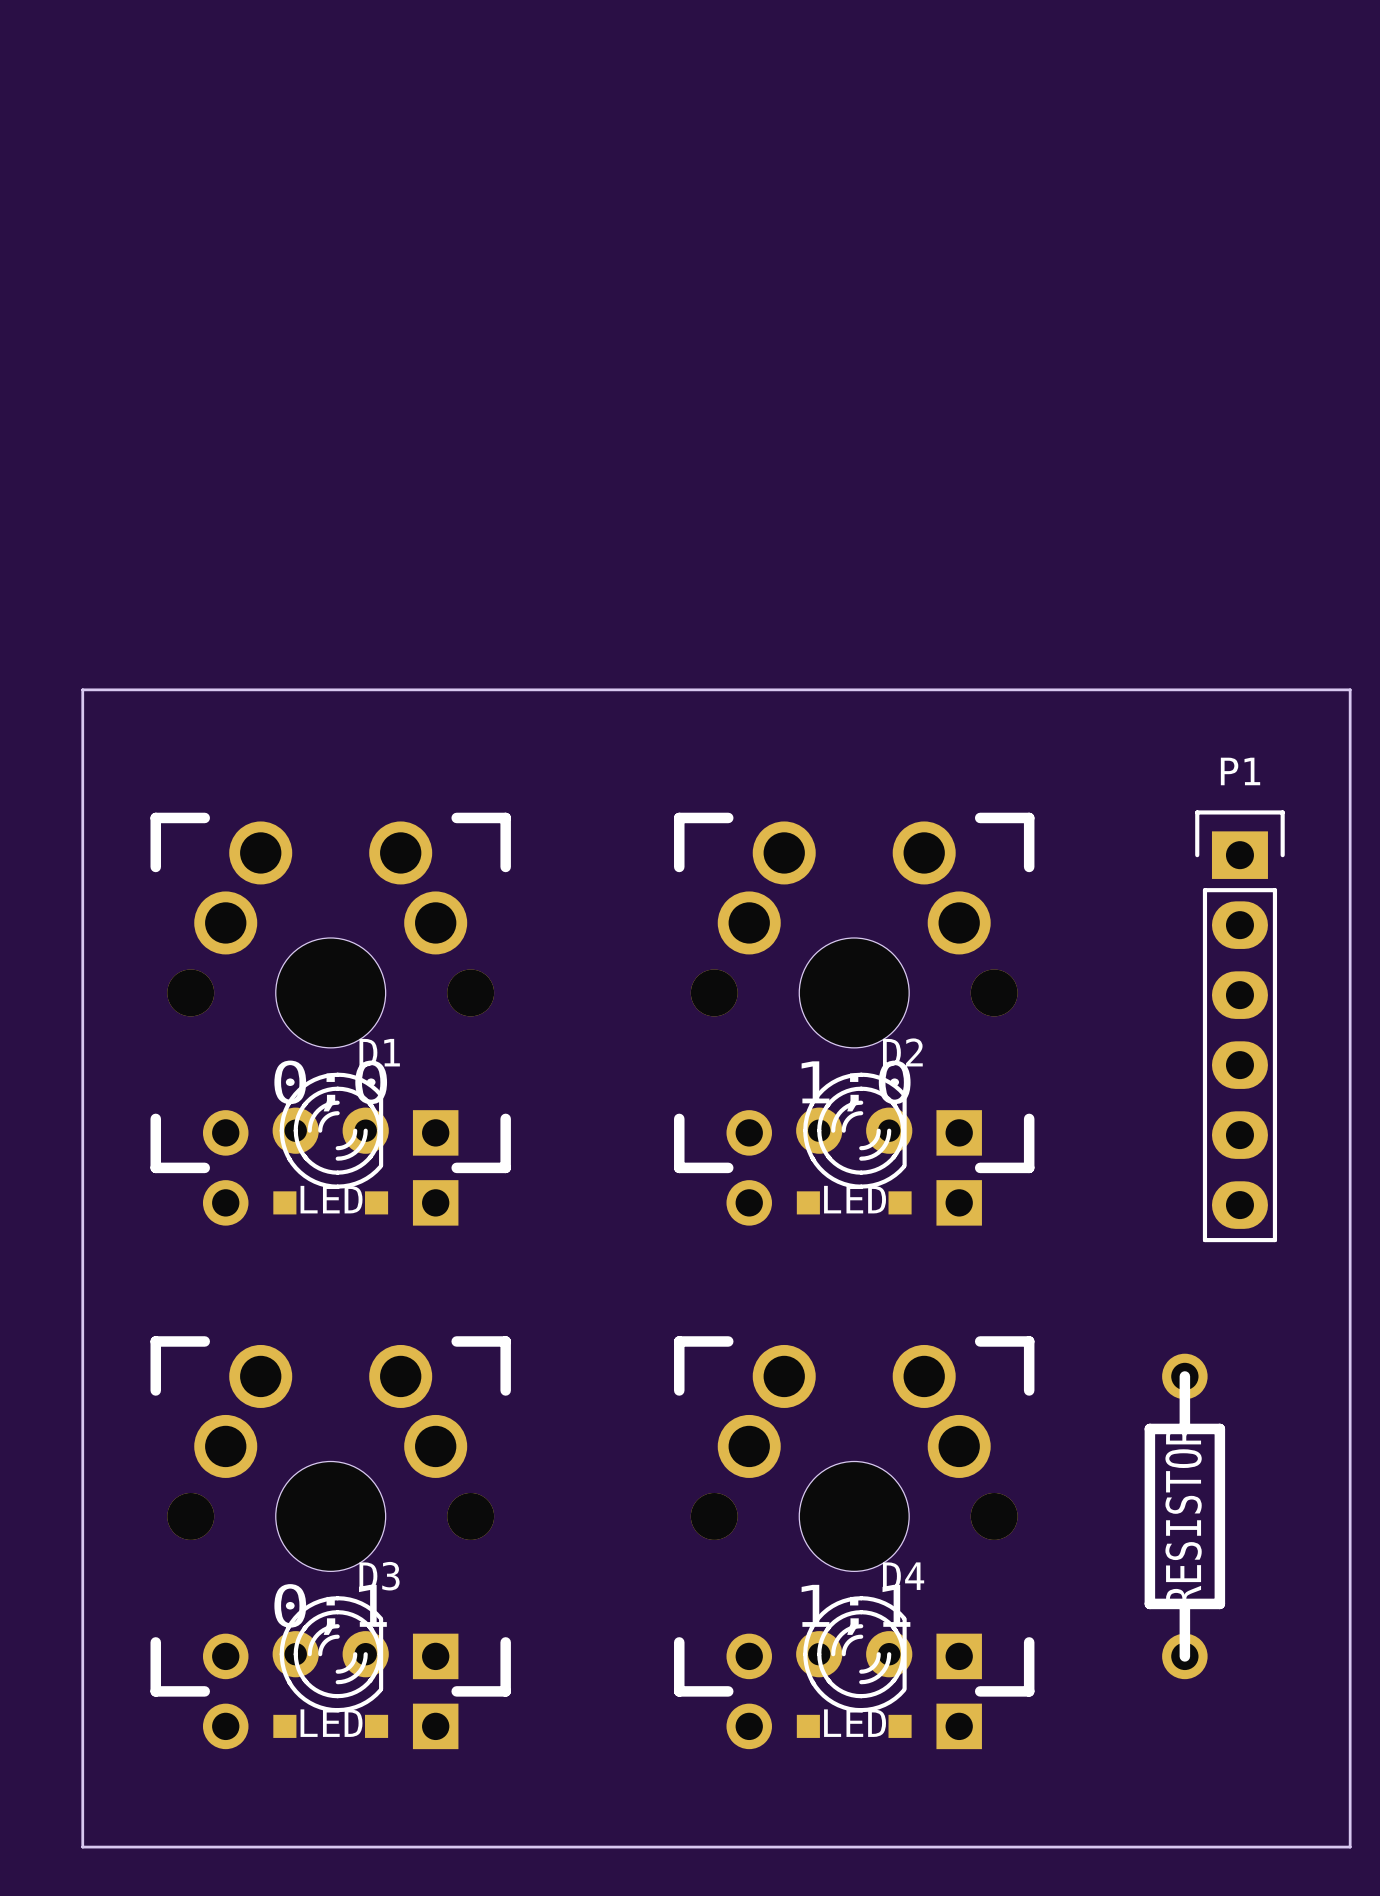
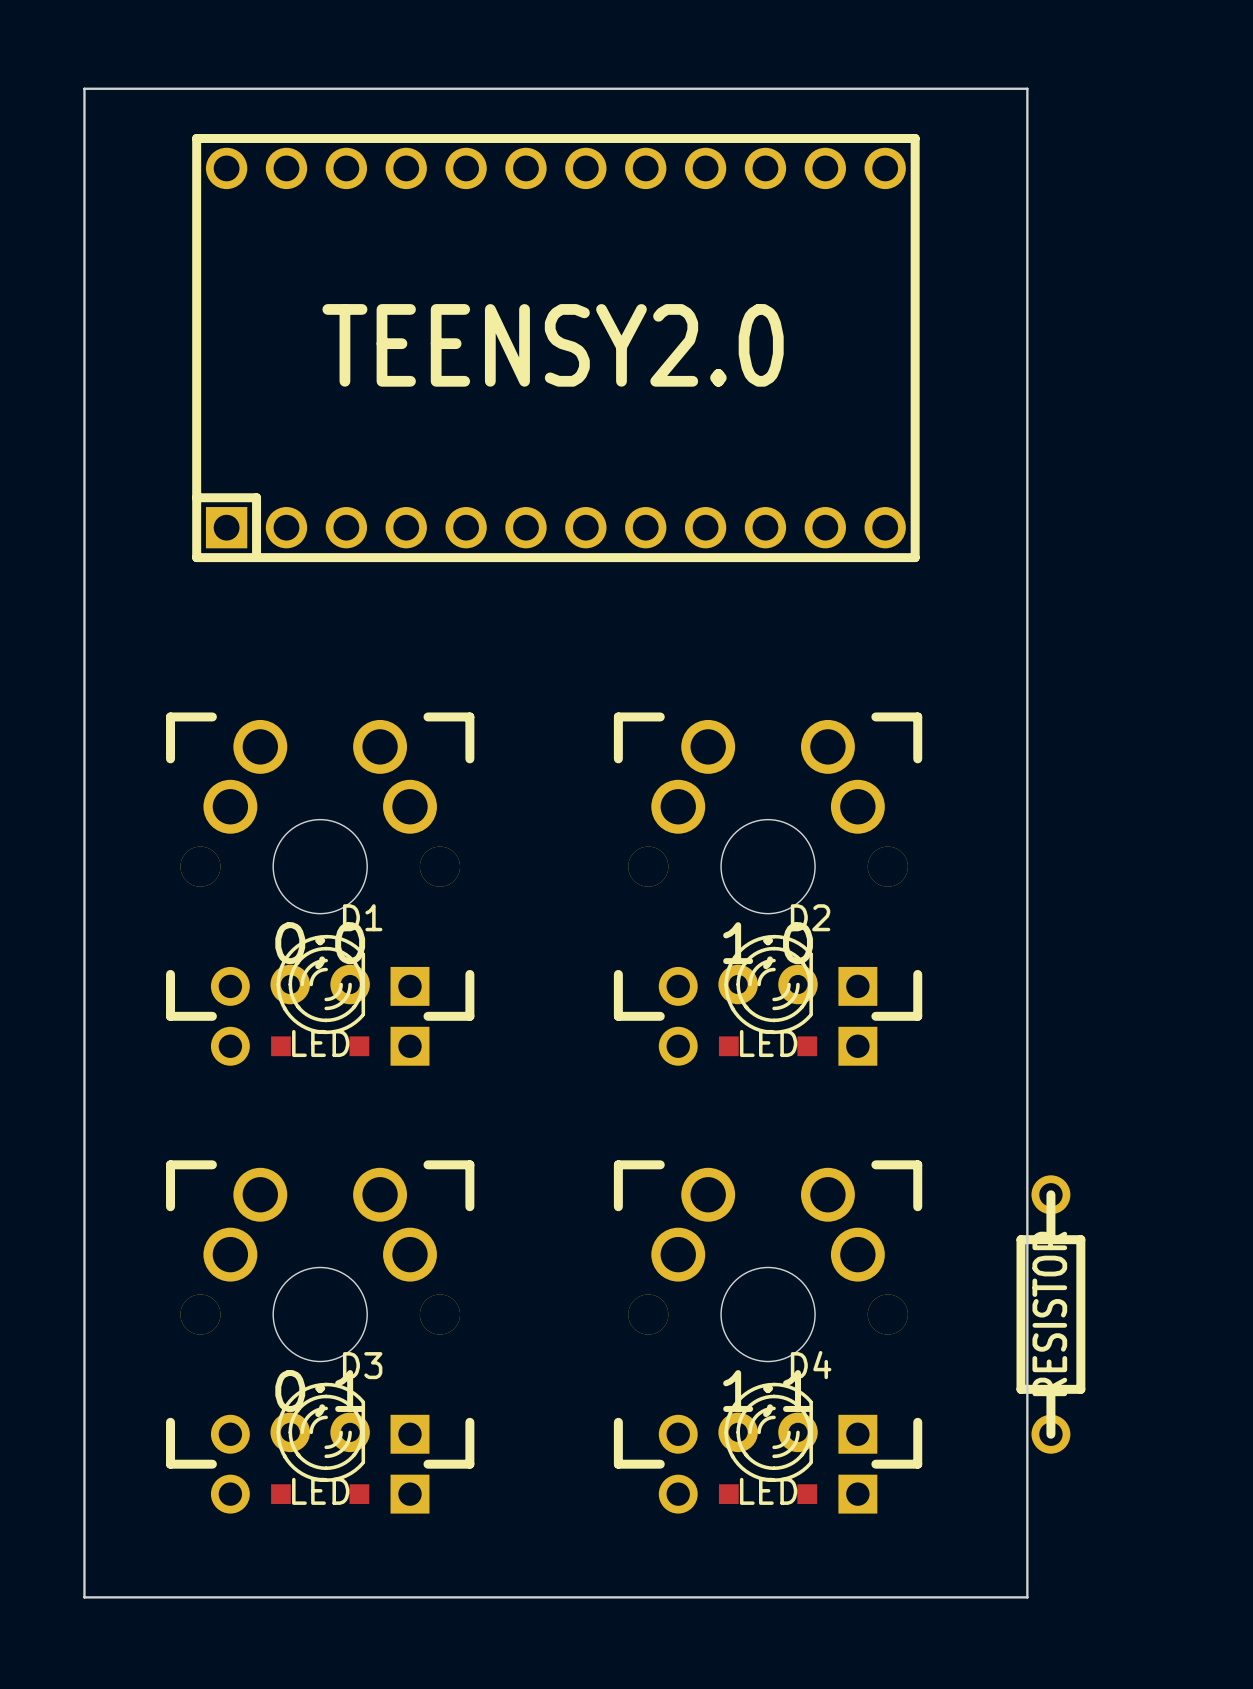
part: none -> TEENSY2.0 (555, 348)
P1: (1239, 1026) -> none
board edge: (82, 1847) (82, 689) (1350, 689) (1350, 1847) (1157, 1847) -> (108, 1597) (84, 1597) (84, 88) (1027, 88) (1027, 1597)

